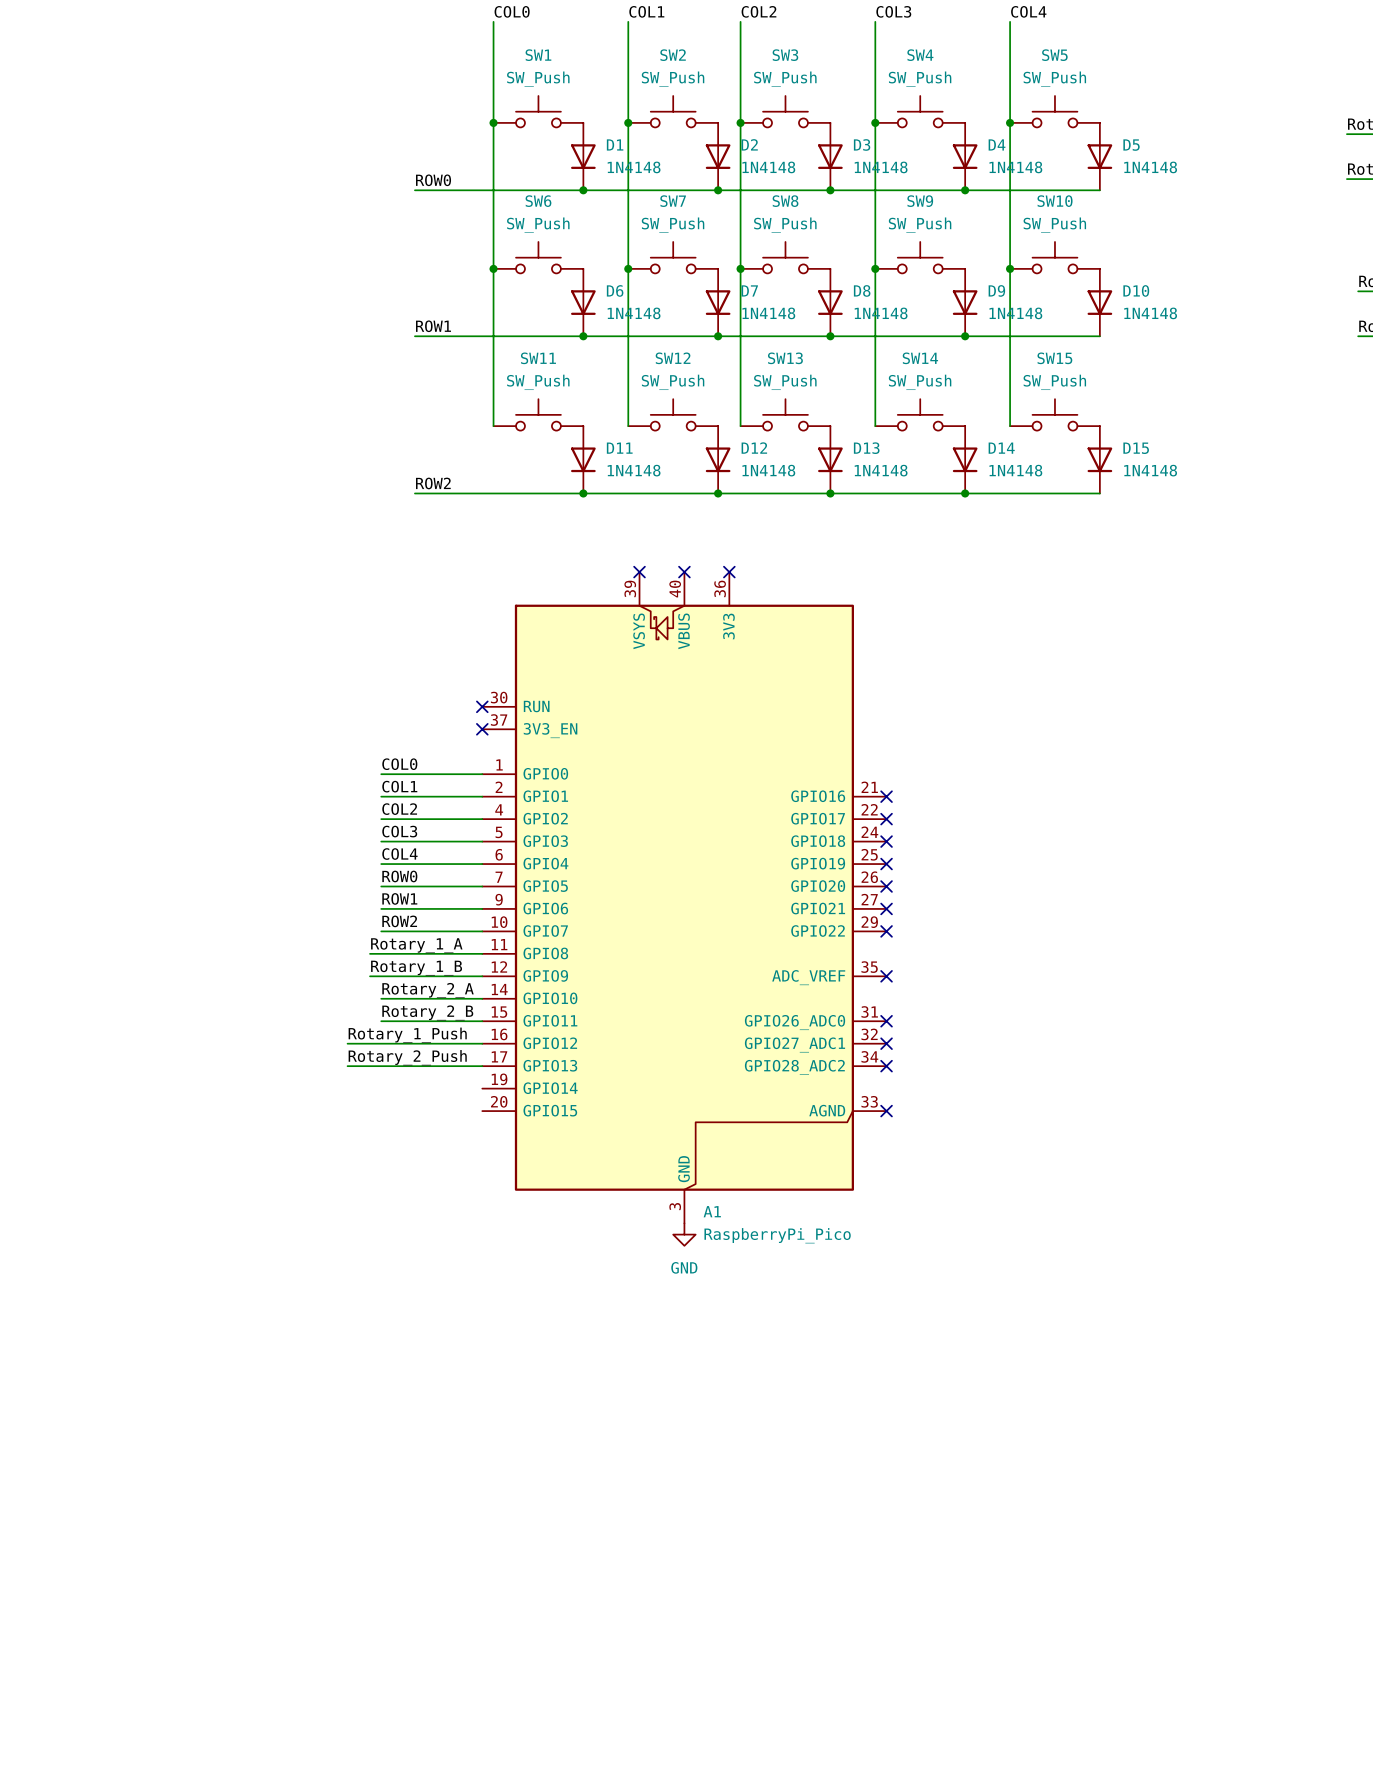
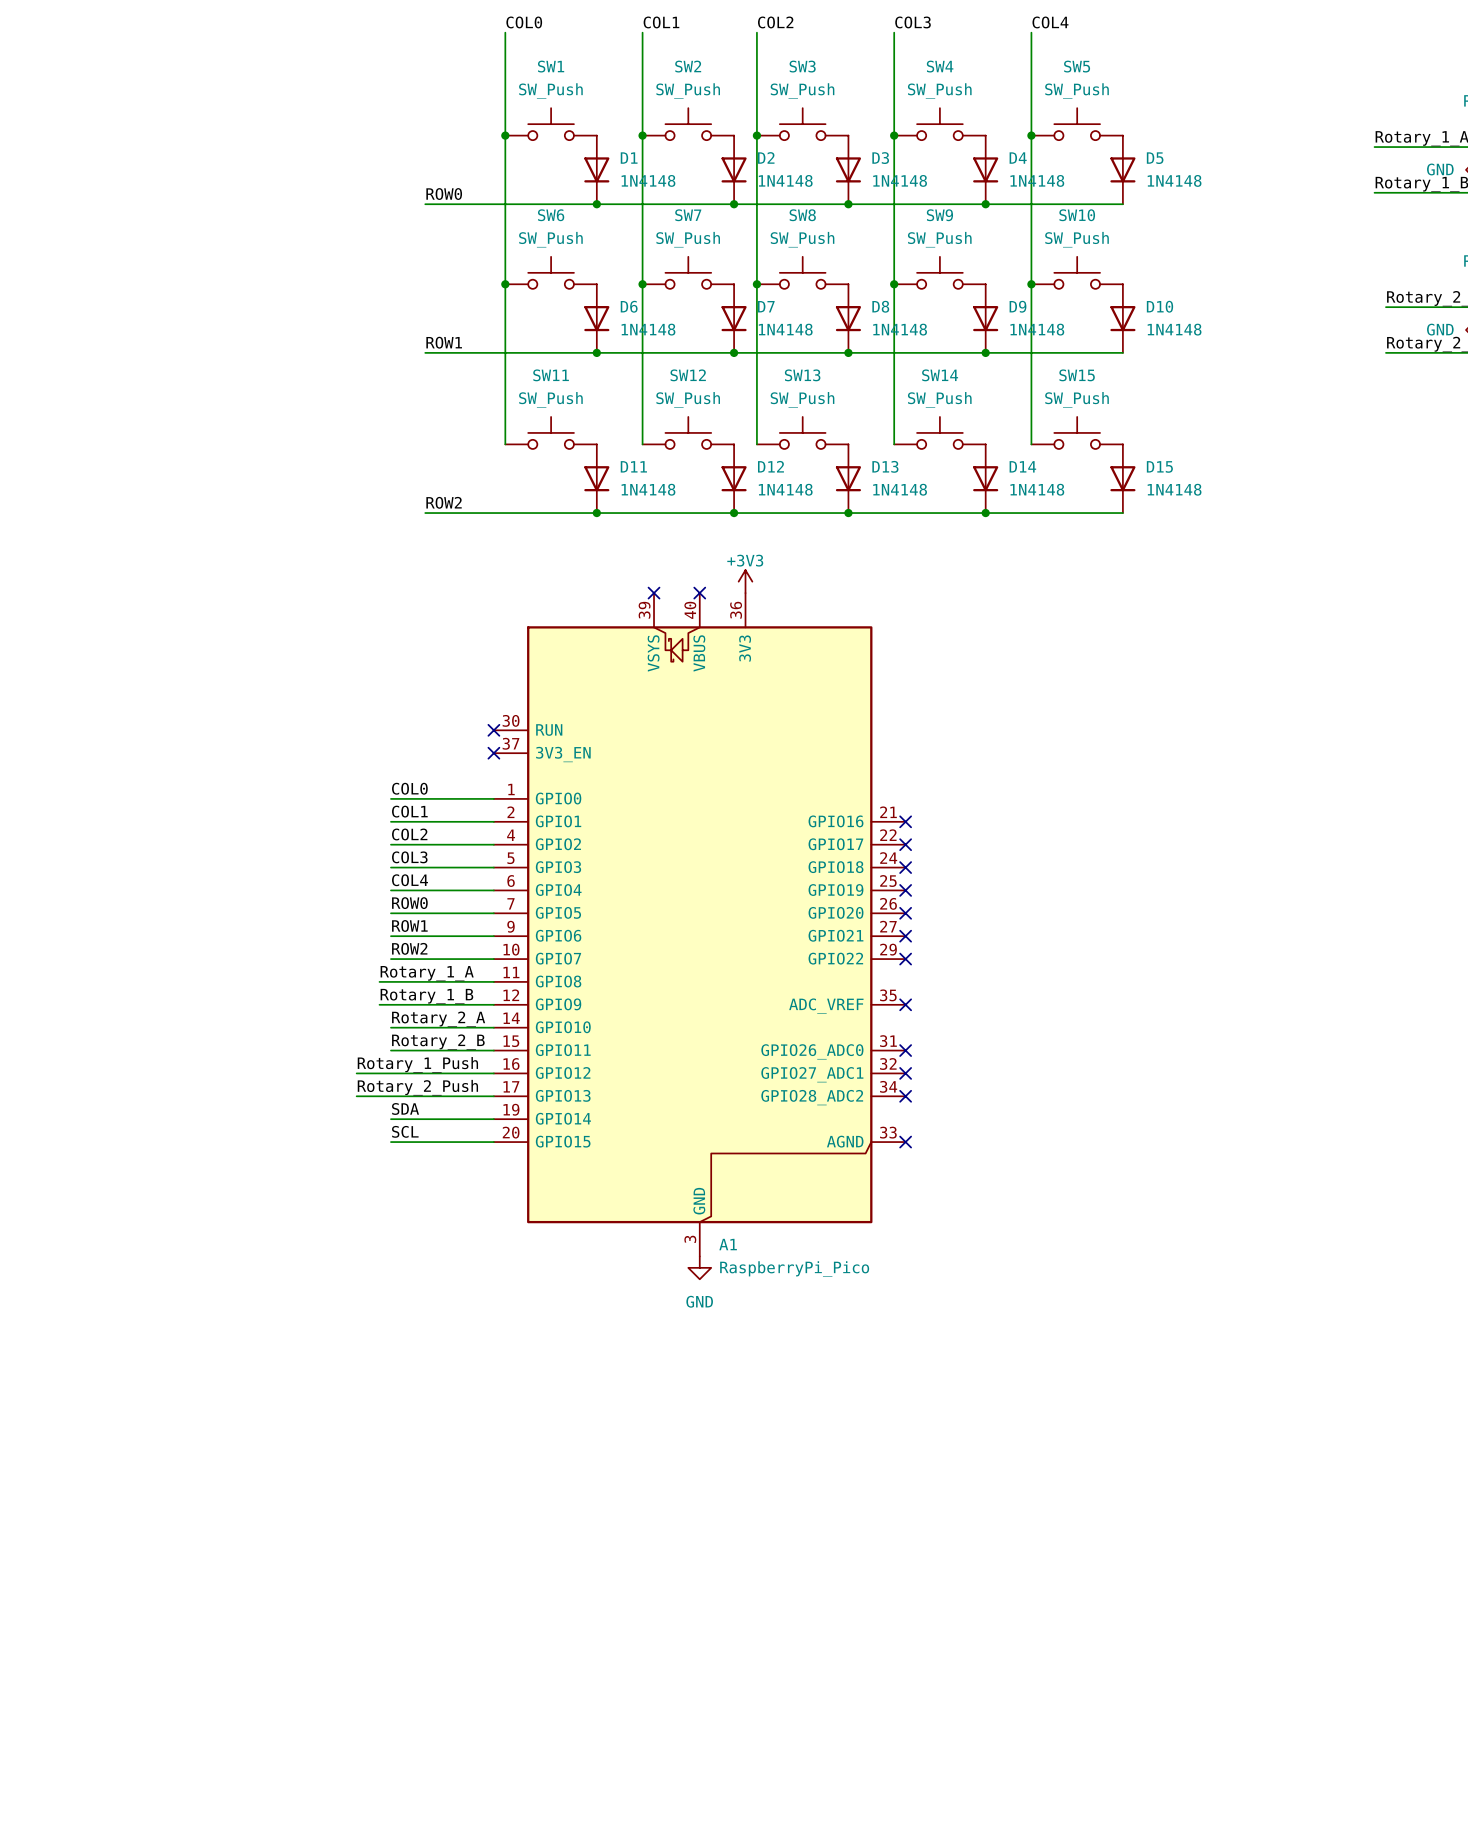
power symbol: none -> +3V3 (745, 581)
no-connect mark: (729, 572) -> none
label: none -> SDA (405, 1108)
wire: none -> (390, 1119) (493, 1119)
label: none -> SCL (405, 1131)
wire: none -> (390, 1142) (493, 1142)

